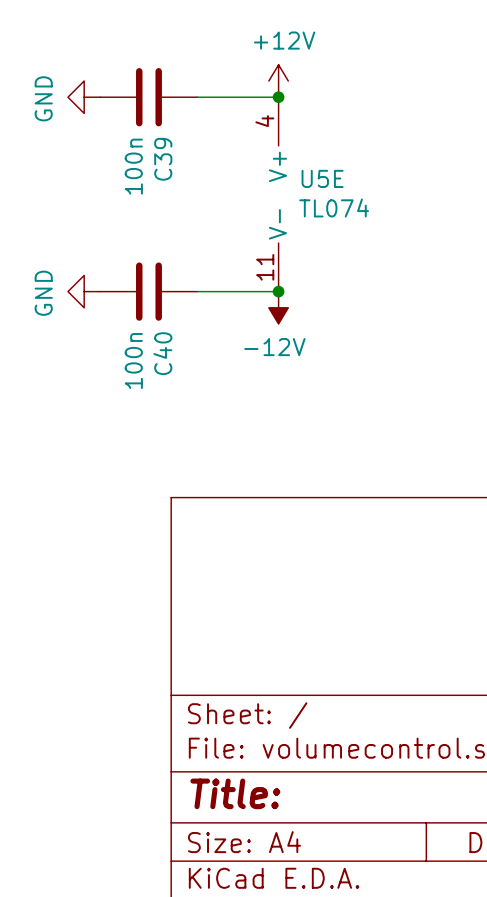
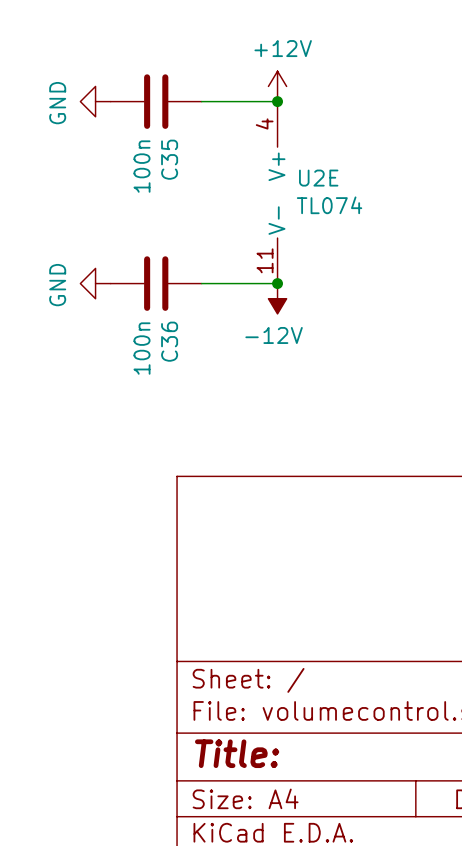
C39 name: C39 (163, 159) -> C35 (169, 159)
U5E name: U5E (322, 178) -> U2E (318, 178)
C40 name: C40 (162, 353) -> C36 (169, 341)

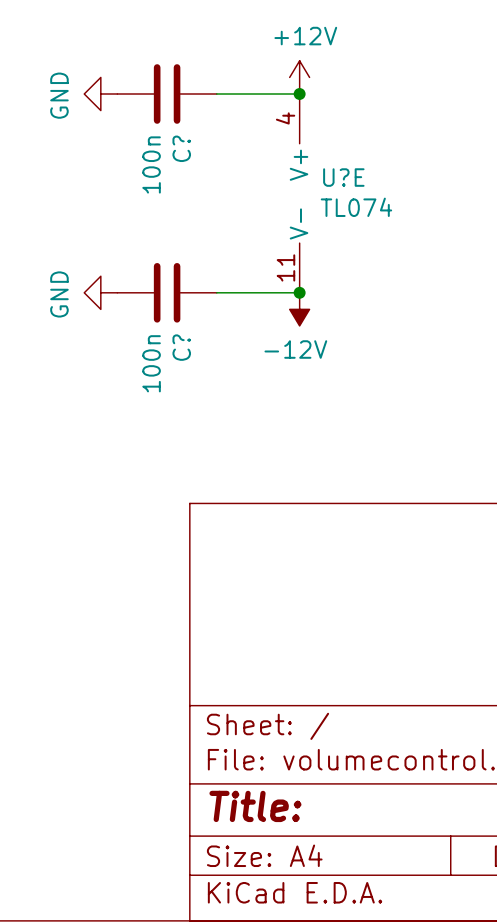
C35 name: C35 (169, 159) -> C? (181, 148)
U2E name: U2E (318, 178) -> U?E (343, 177)
C36 name: C36 (169, 341) -> C? (181, 347)

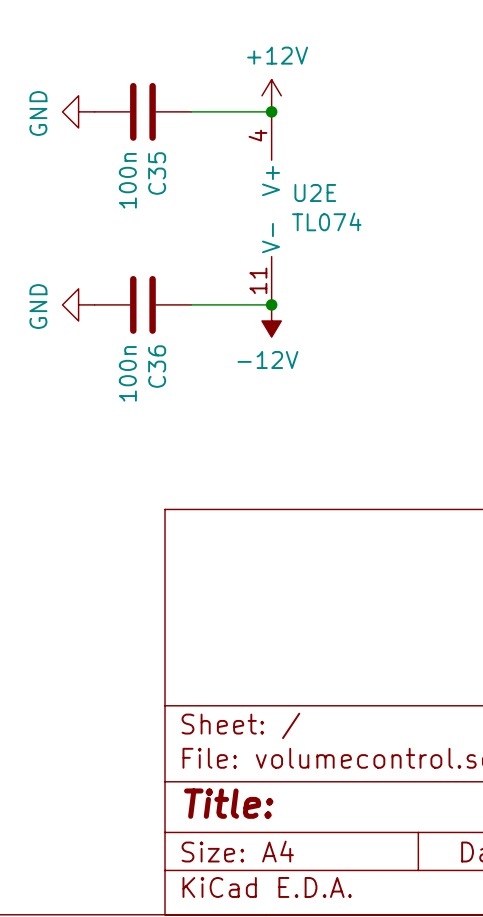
C? name: C? (181, 148) -> C35 (157, 173)
U?E name: U?E (343, 177) -> U2E (315, 193)
C? name: C? (181, 347) -> C36 (157, 366)

